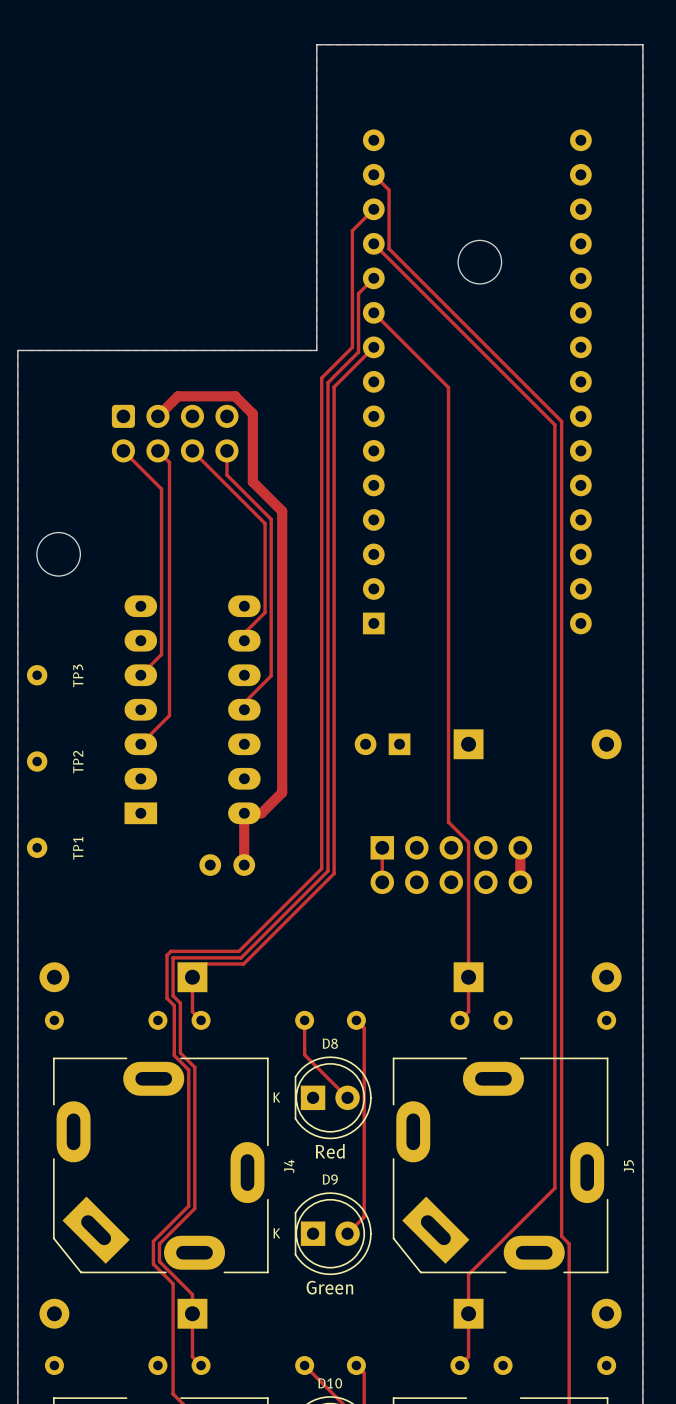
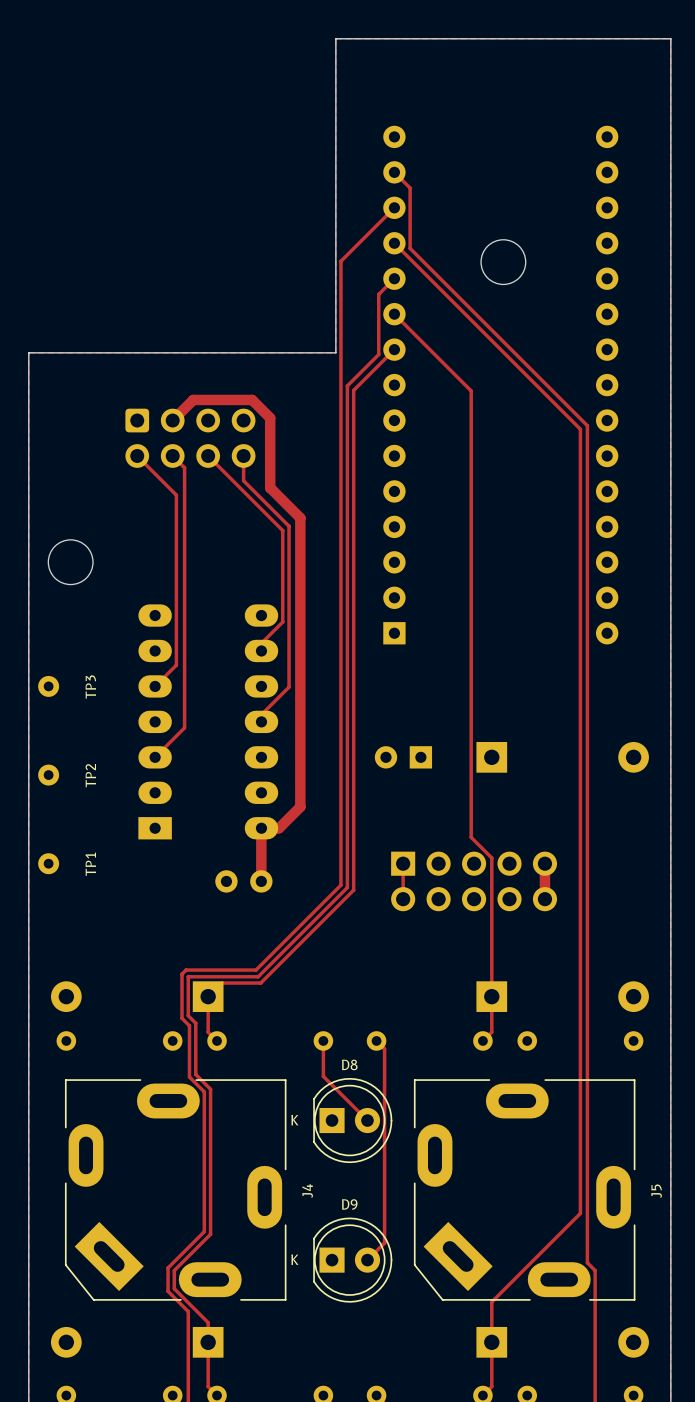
track: (352, 230) (352, 347) (321, 378) -> (372, 229) (340, 261) (340, 381)
text: Red (330, 1151) -> none
text: Green (329, 1287) -> none

